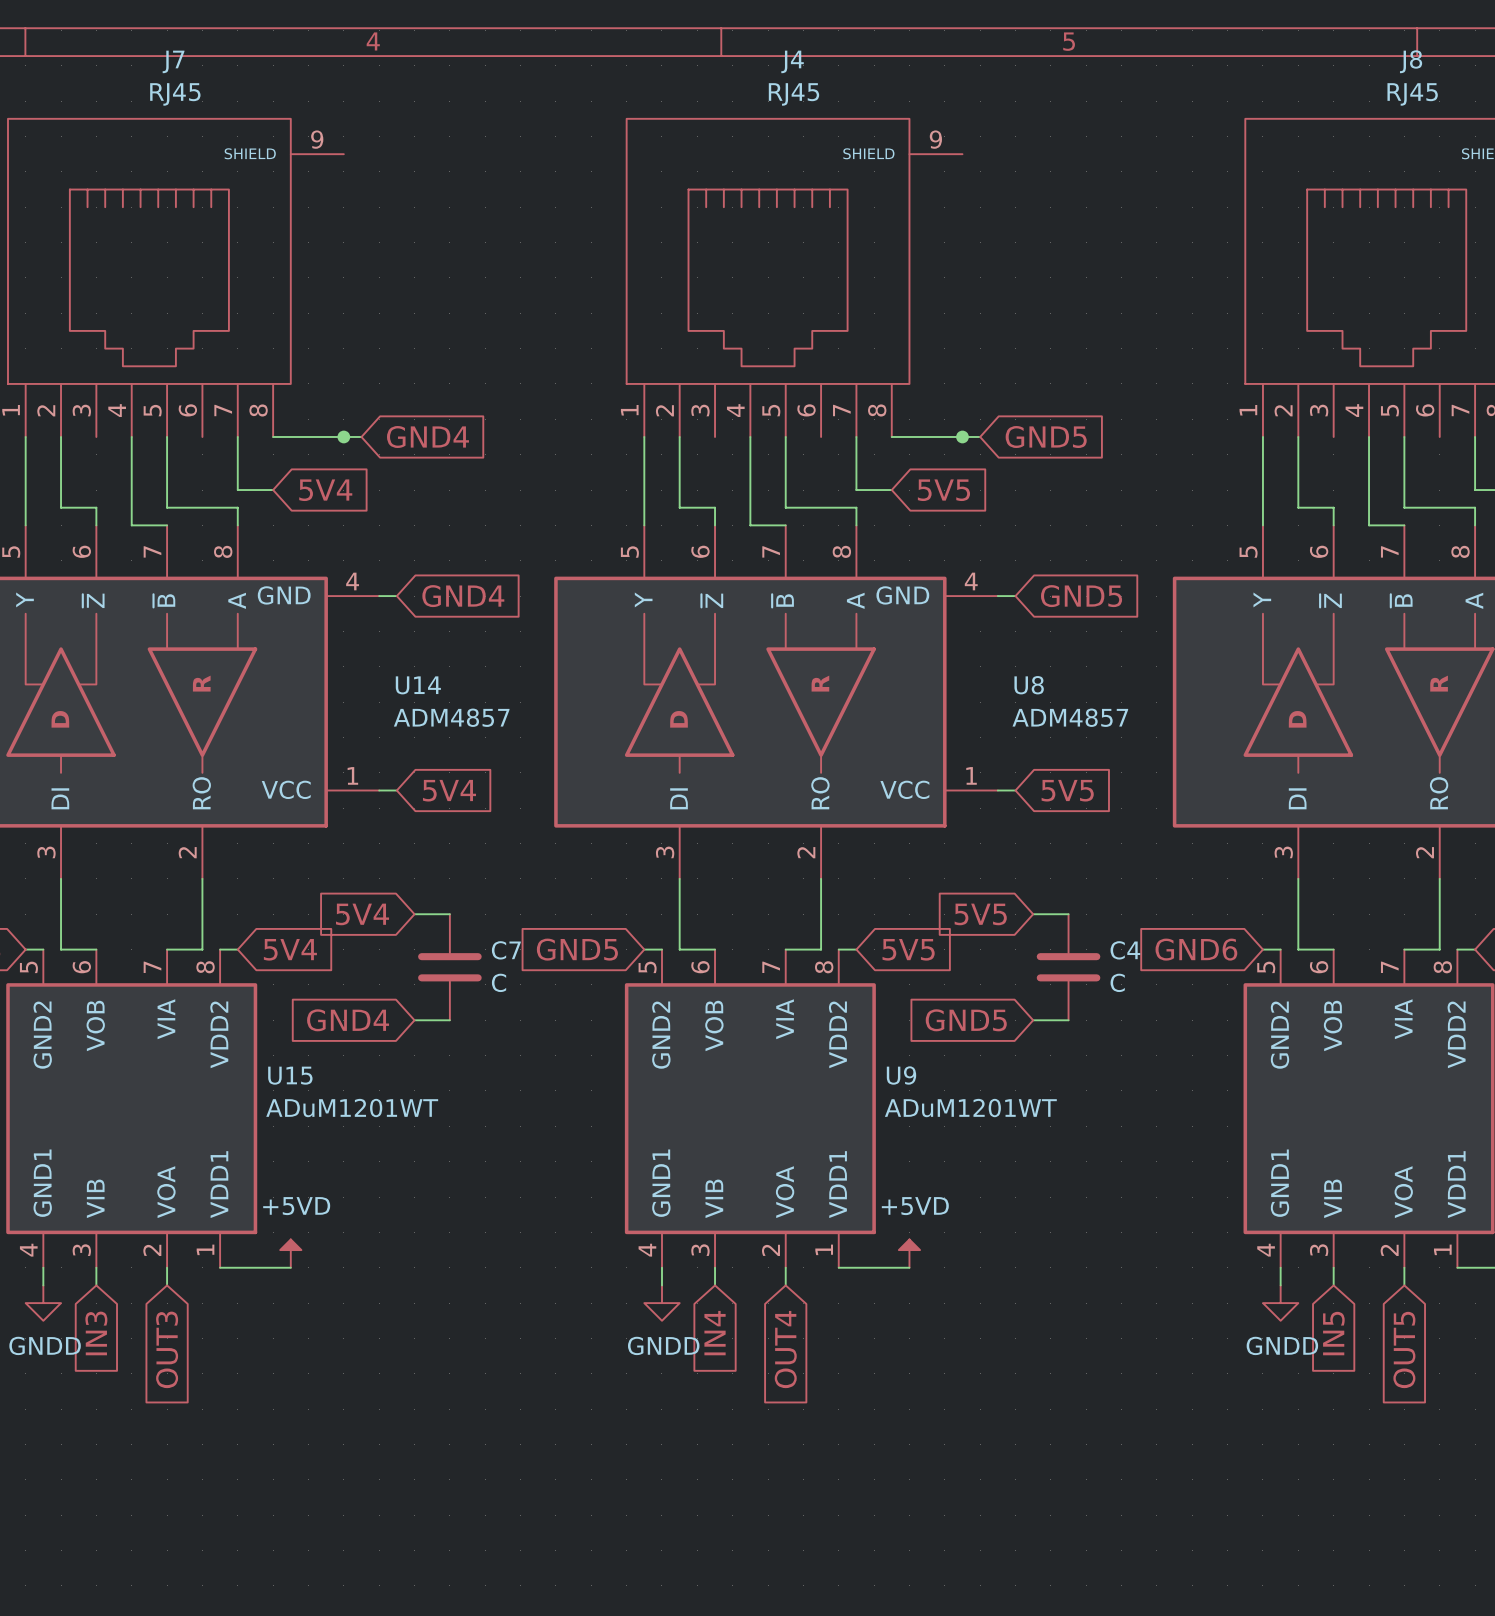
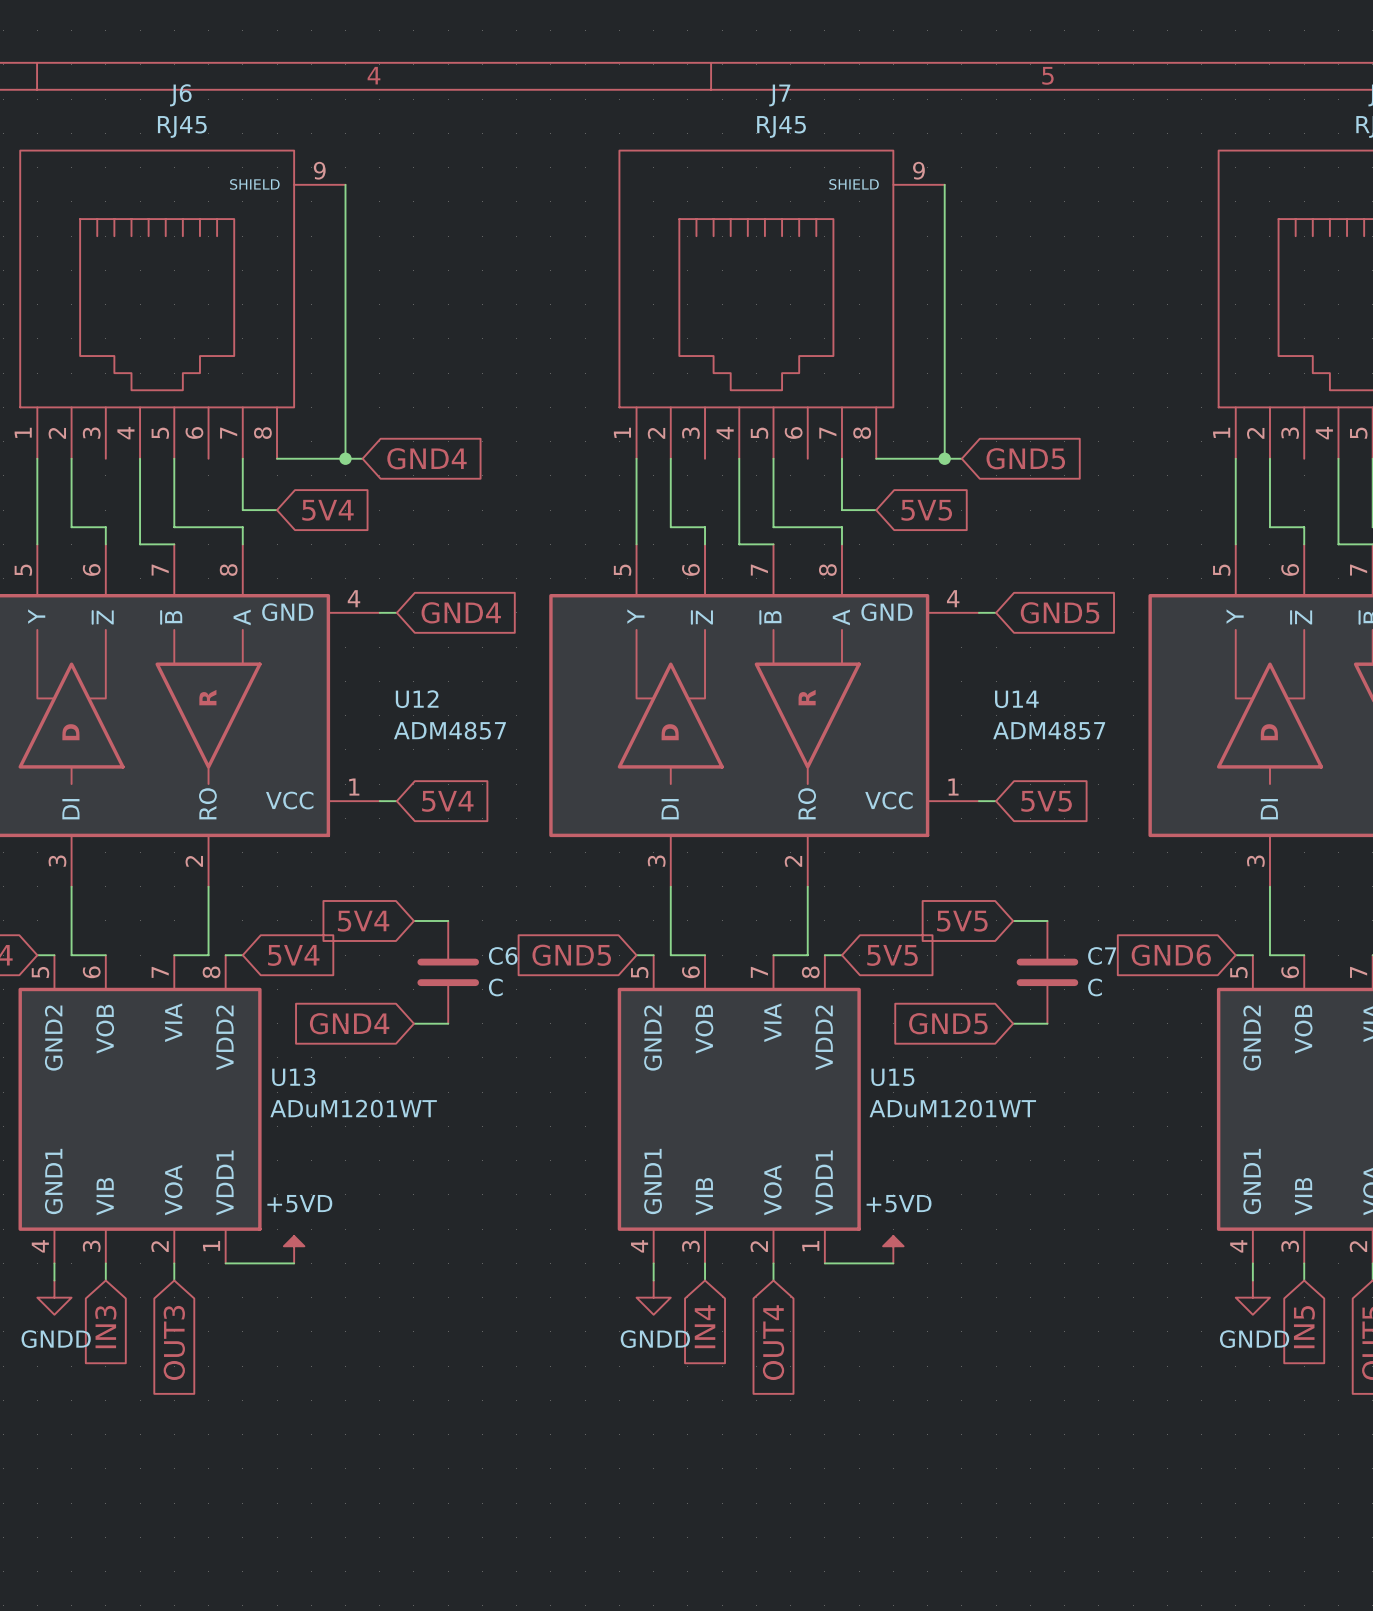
J7 name: J7 (173, 61) -> J6 (180, 95)
J4 name: J4 (792, 61) -> J7 (779, 95)
wire: none -> (345, 184) (345, 458)
wire: none -> (944, 184) (944, 458)
U14 name: U14 (418, 685) -> U12 (417, 699)
U8 name: U8 (1029, 685) -> U14 (1016, 699)
C7 name: C7 (506, 950) -> C6 (503, 955)
C4 name: C4 (1125, 950) -> C7 (1102, 955)
U15 name: U15 (290, 1075) -> U13 (293, 1077)
U9 name: U9 (901, 1075) -> U15 (892, 1077)

